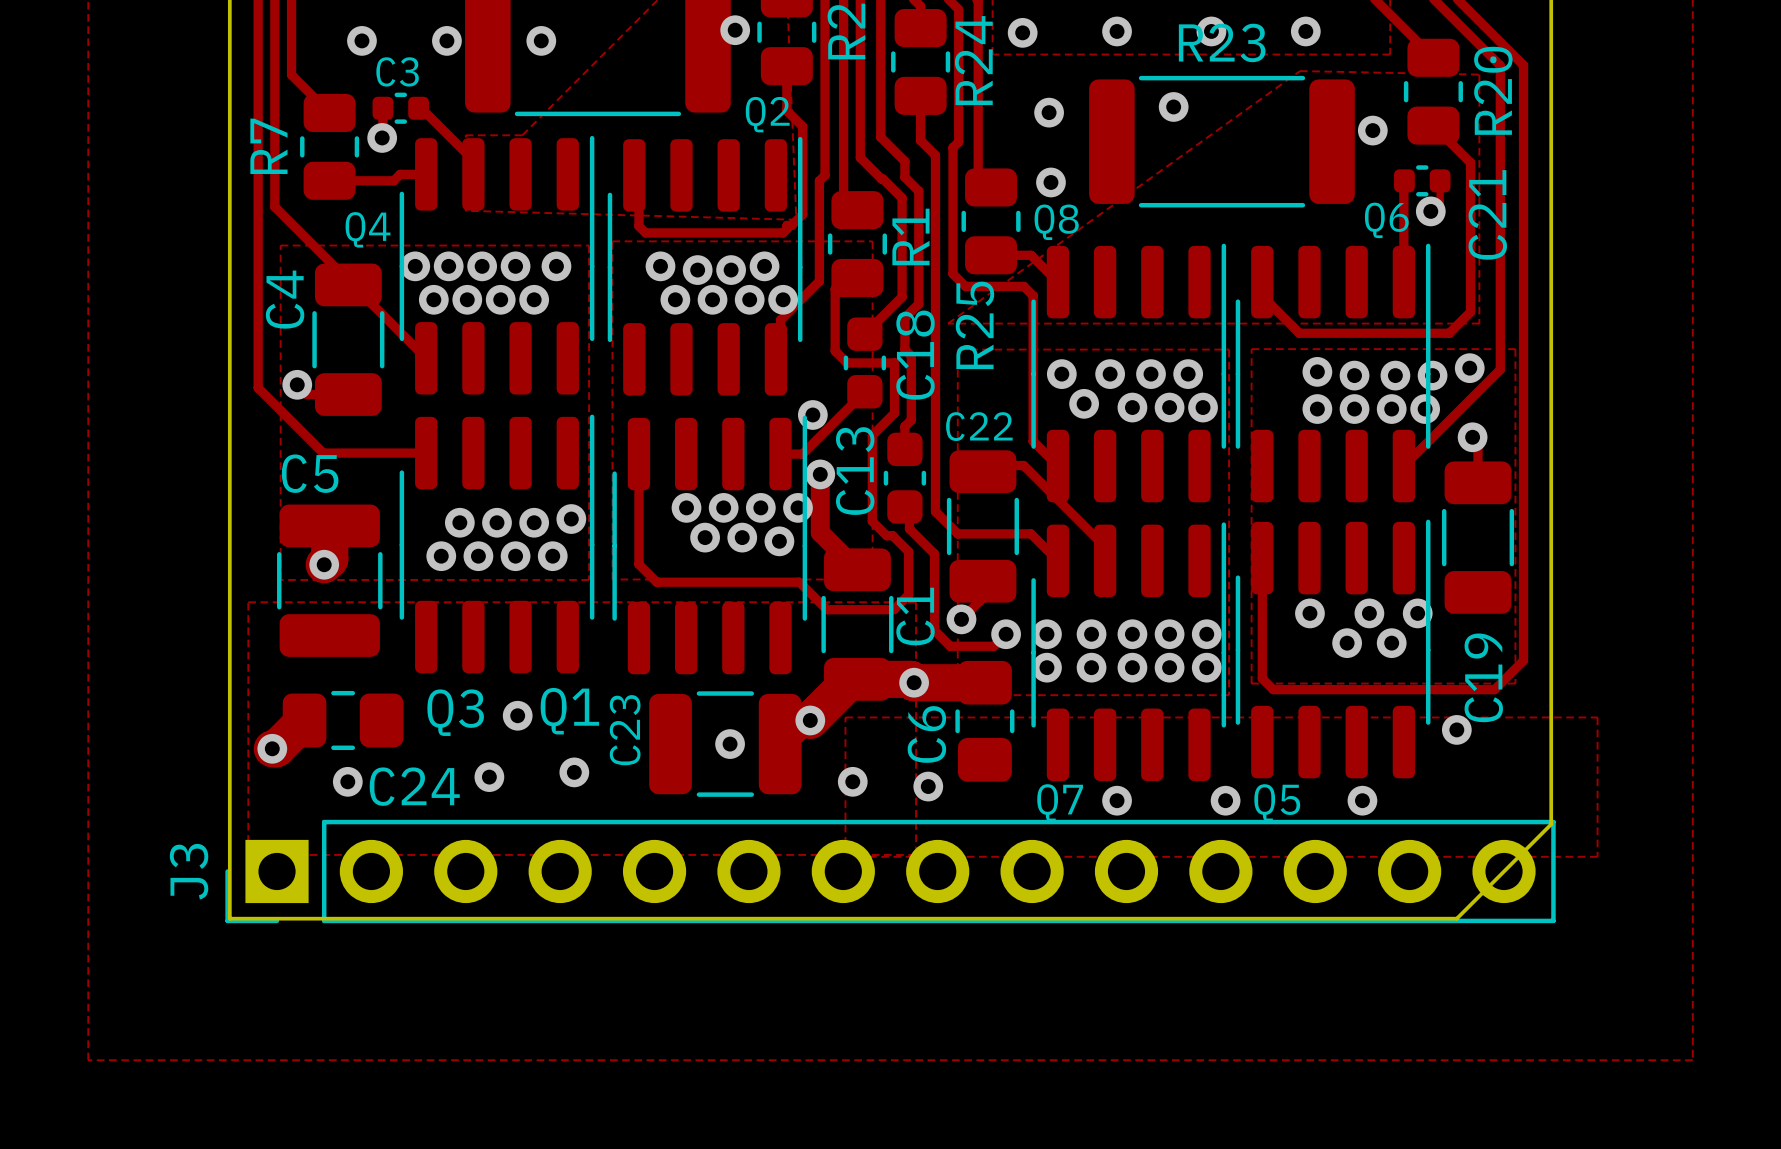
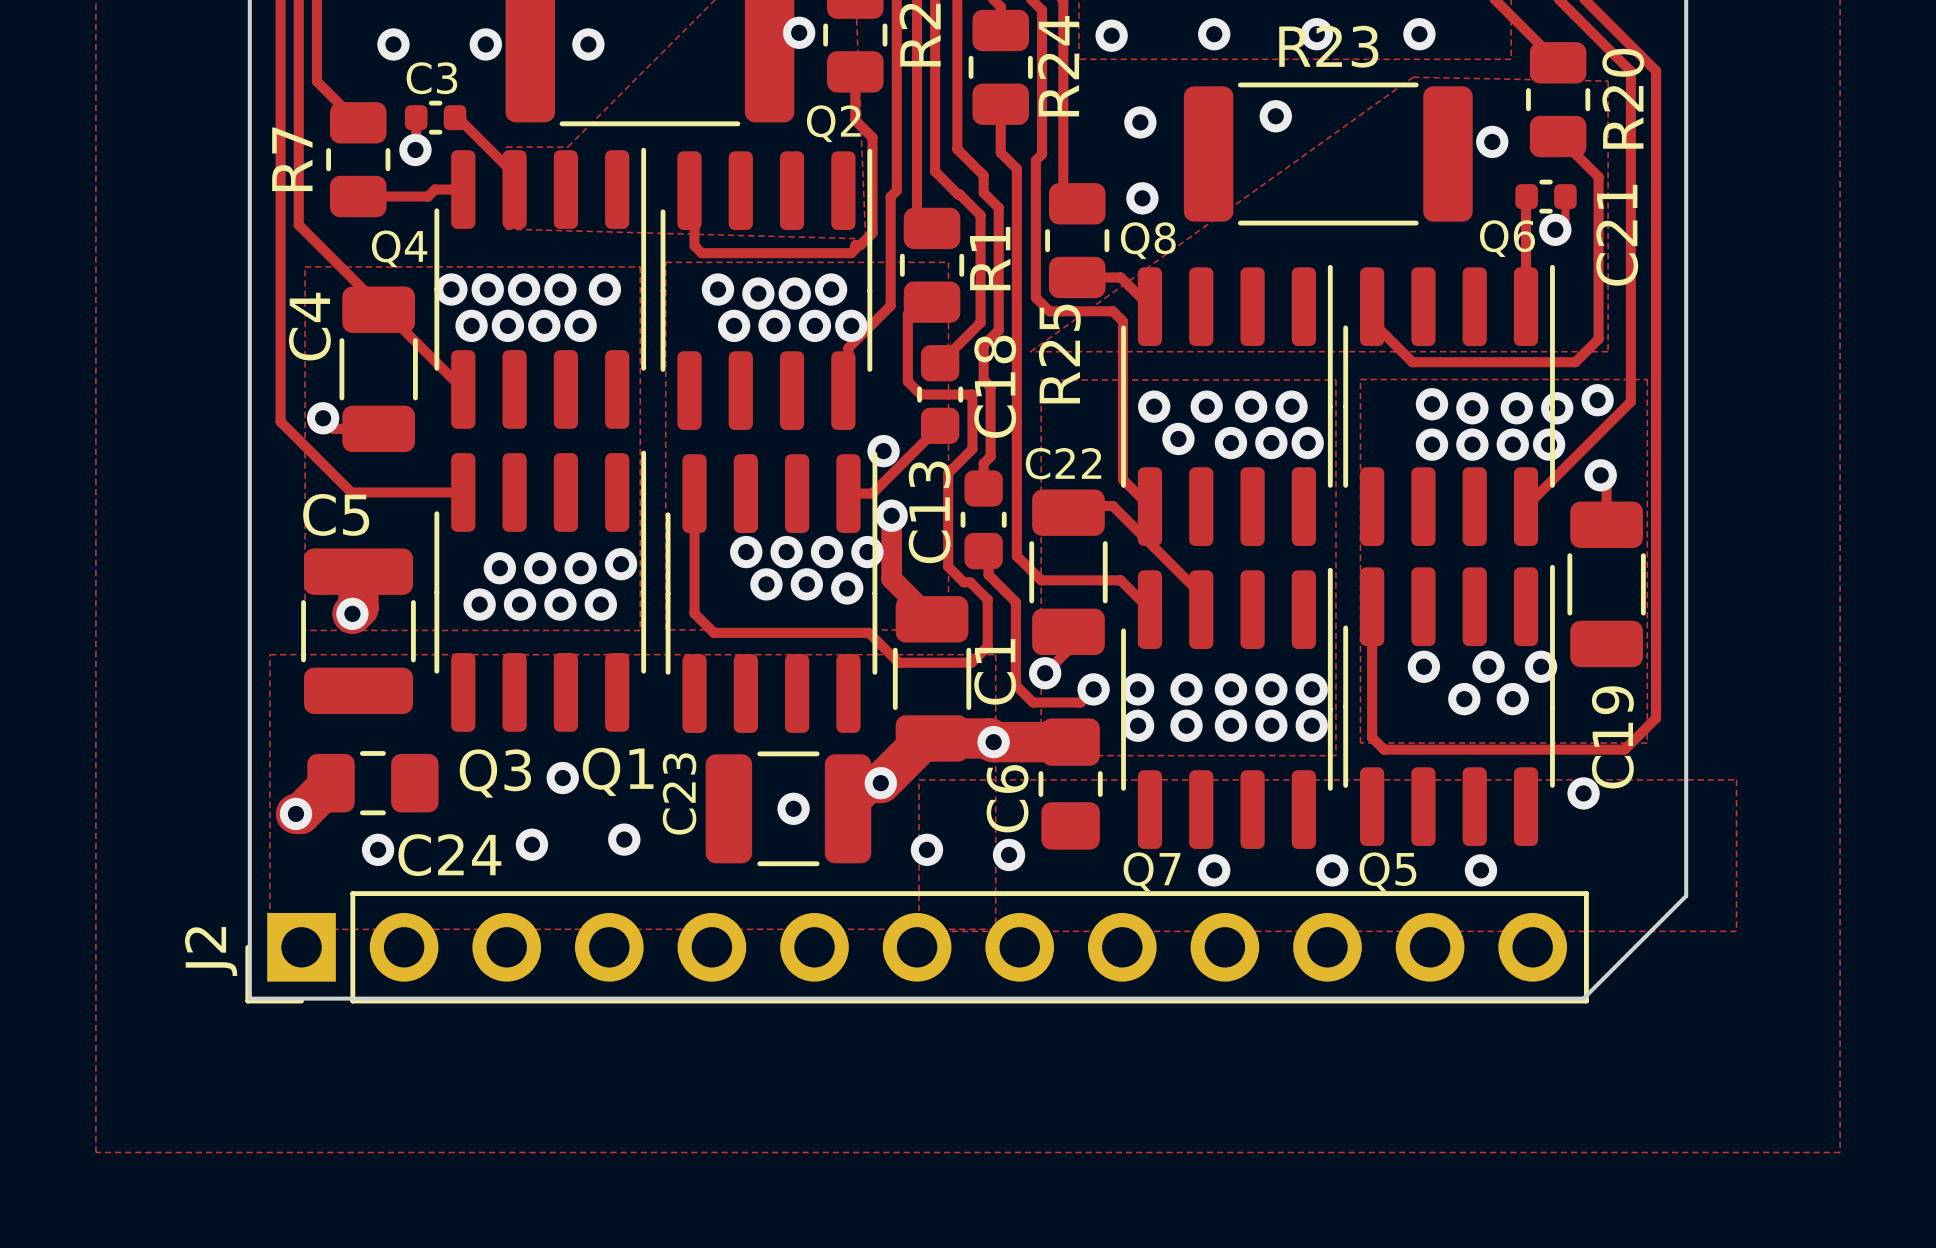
J2: none -> (917, 947)
J3: (890, 871) -> none

